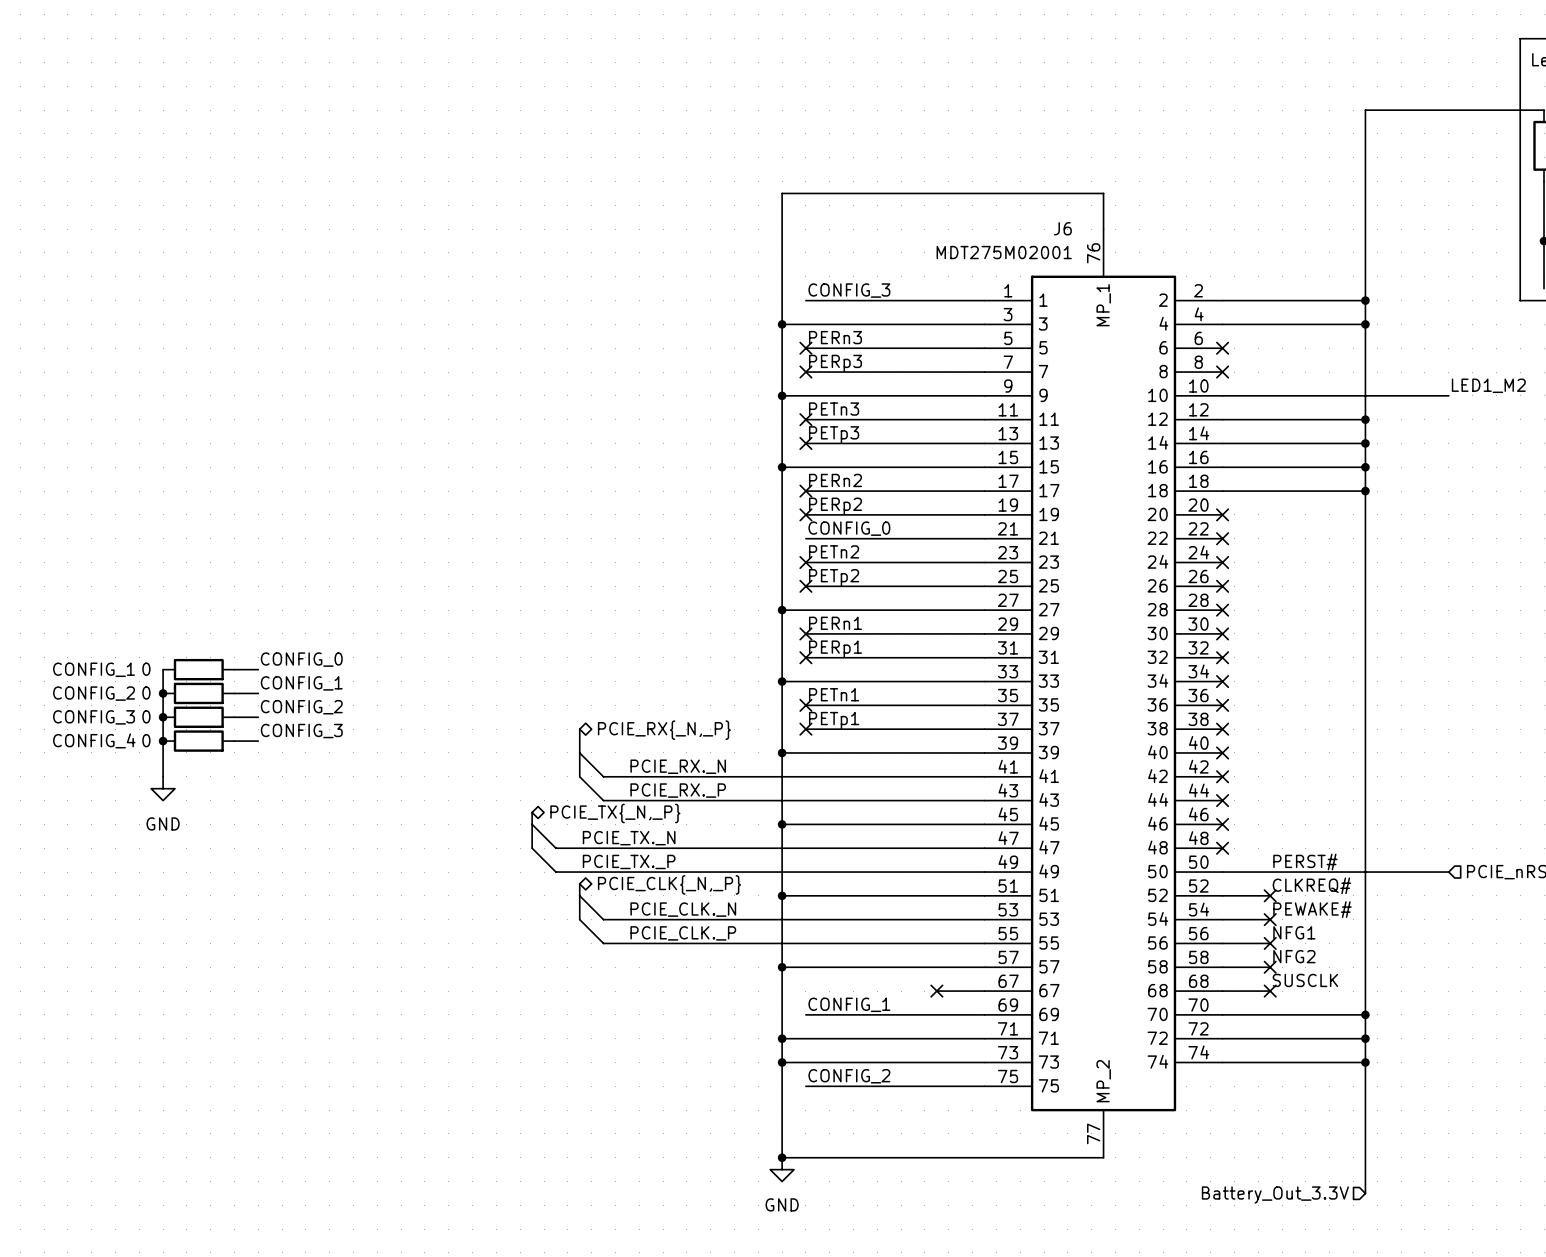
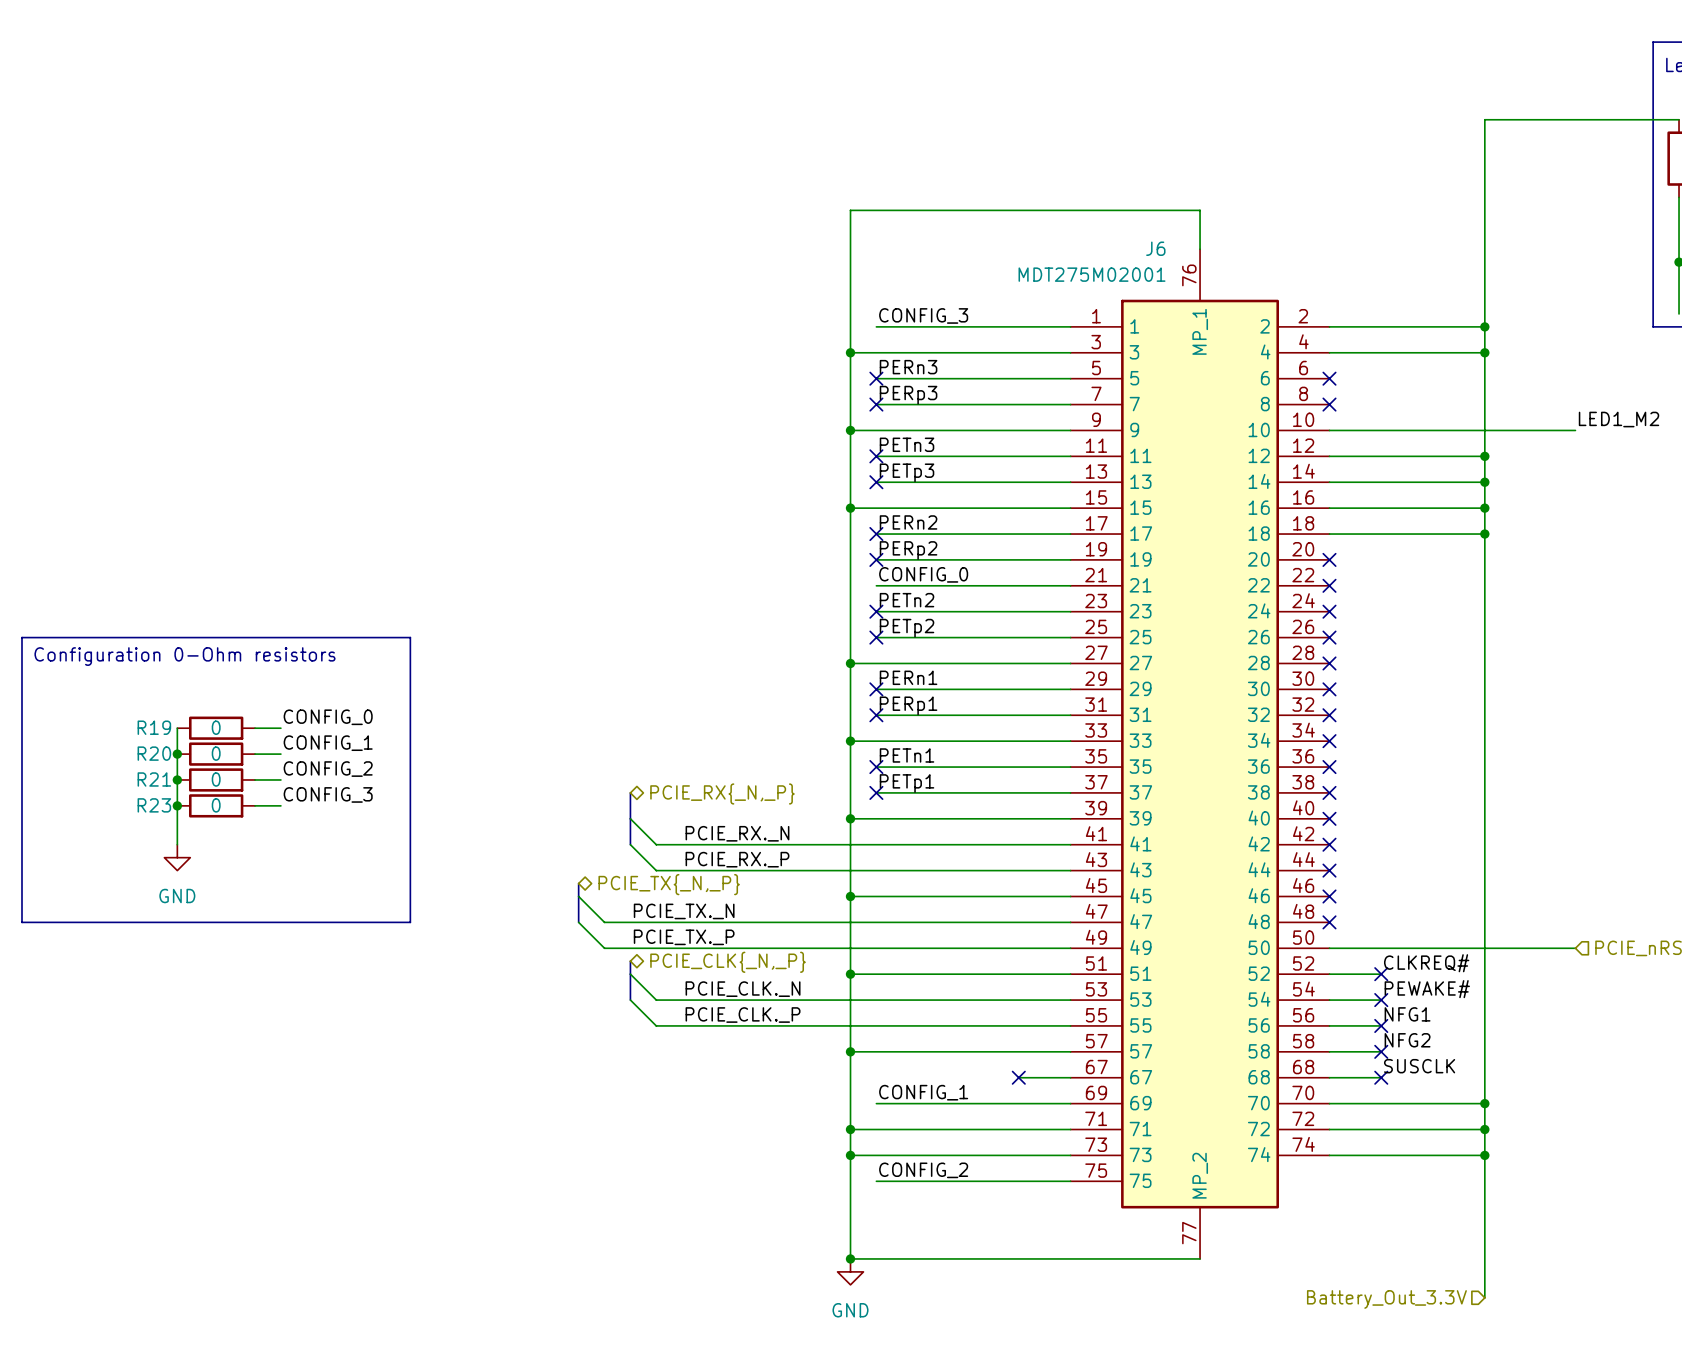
line: none -> (21, 637) (410, 637) (410, 922) (21, 922) (21, 637)
text: none -> Configuration 0-Ohm resistors (184, 656)
CONFIG_1 name: CONFIG_1 (94, 669) -> R19 (154, 727)
CONFIG_1 value position: 0 (146, 669) -> 0 (216, 727)
CONFIG_2 name: CONFIG_2 (94, 693) -> R20 (154, 753)
CONFIG_2 value position: 0 (146, 693) -> 0 (216, 753)
CONFIG_3 value position: 0 (146, 716) -> 0 (216, 779)
CONFIG_3 name: CONFIG_3 (94, 717) -> R21 (154, 779)
CONFIG_4 name: CONFIG_4 (94, 740) -> R23 (154, 805)
CONFIG_4 value position: 0 (146, 740) -> 0 (216, 805)
label: PERST# (1305, 861) -> none

